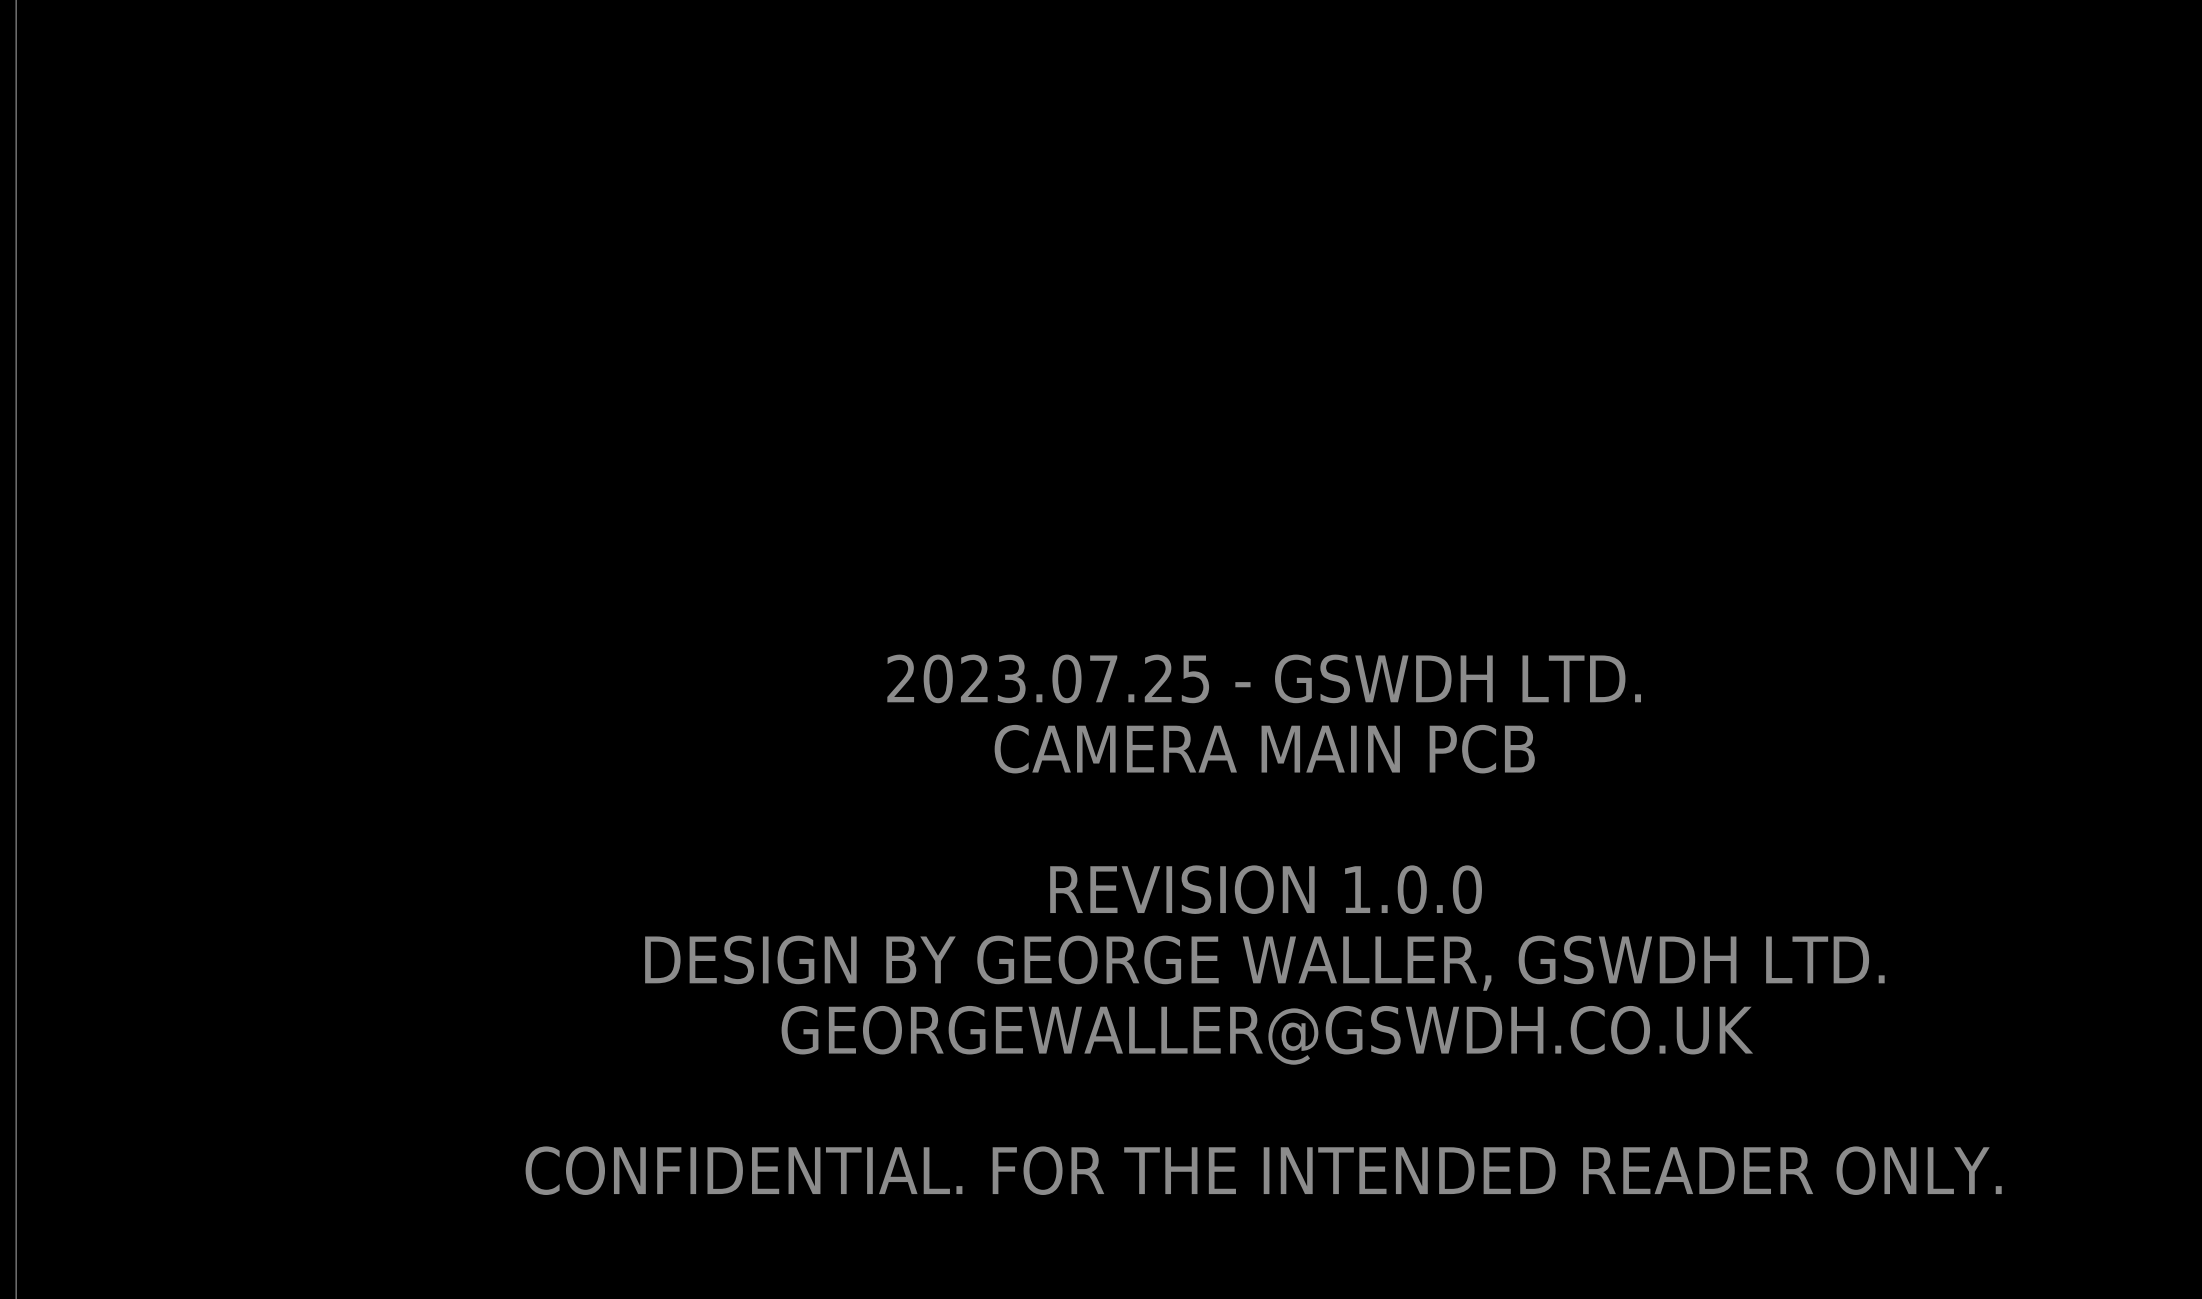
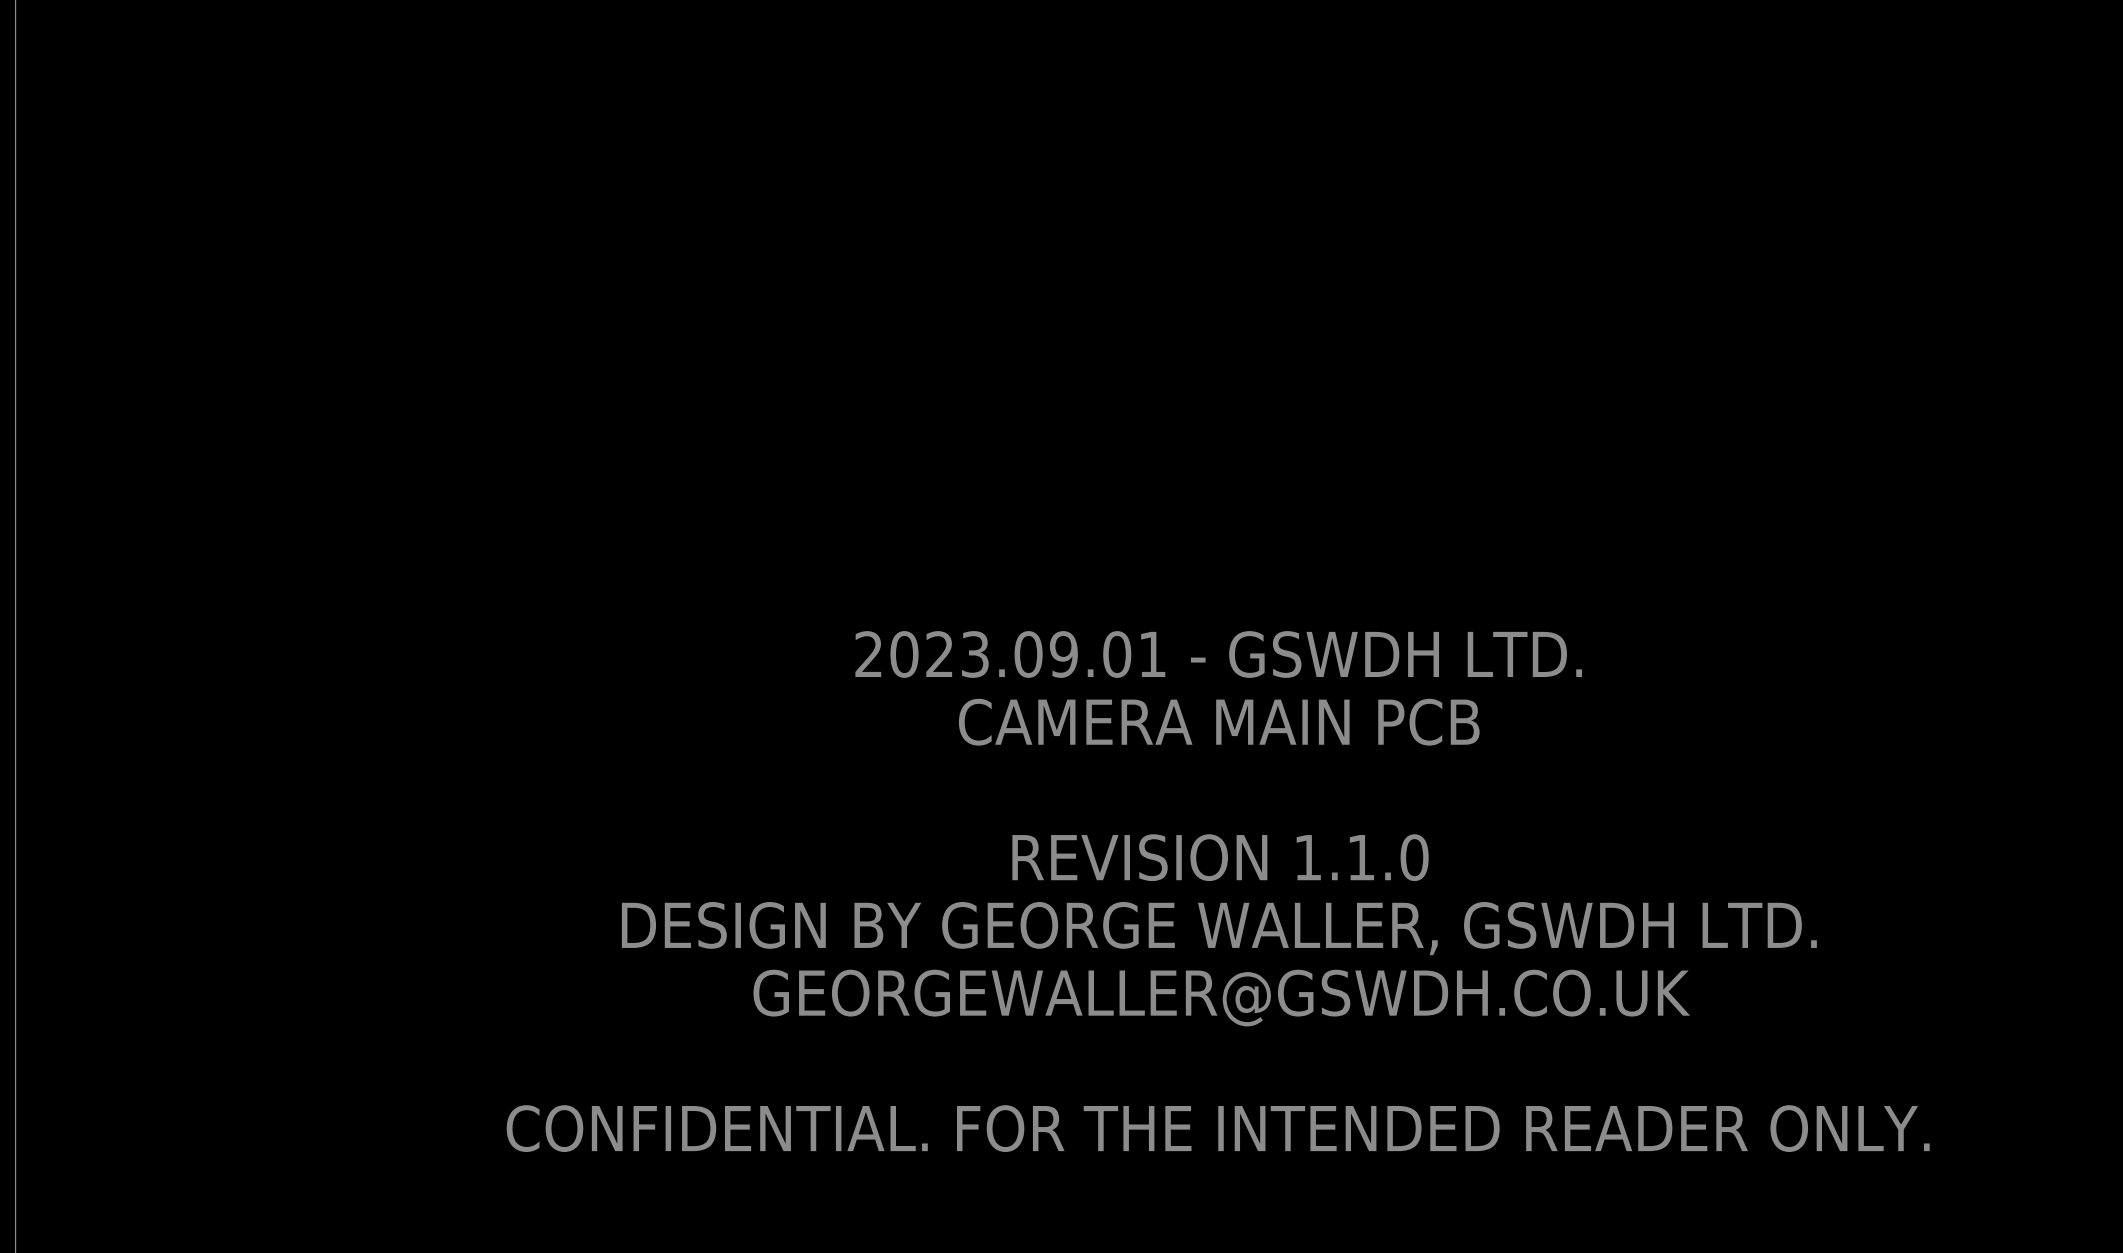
text: 2023.07.25 - GSWDH LTD. (1264, 678) -> 2023.09.01 - GSWDH LTD. (1218, 654)
text: REVISION 1.0.0 (1266, 889) -> REVISION 1.1.0 (1220, 857)

